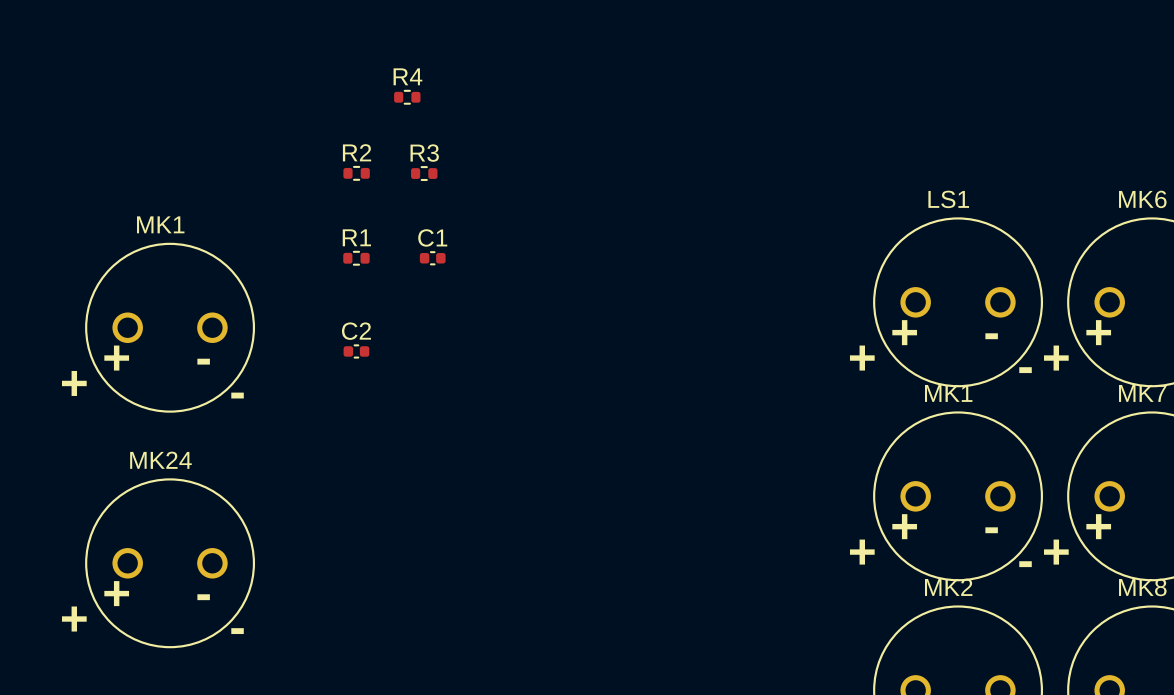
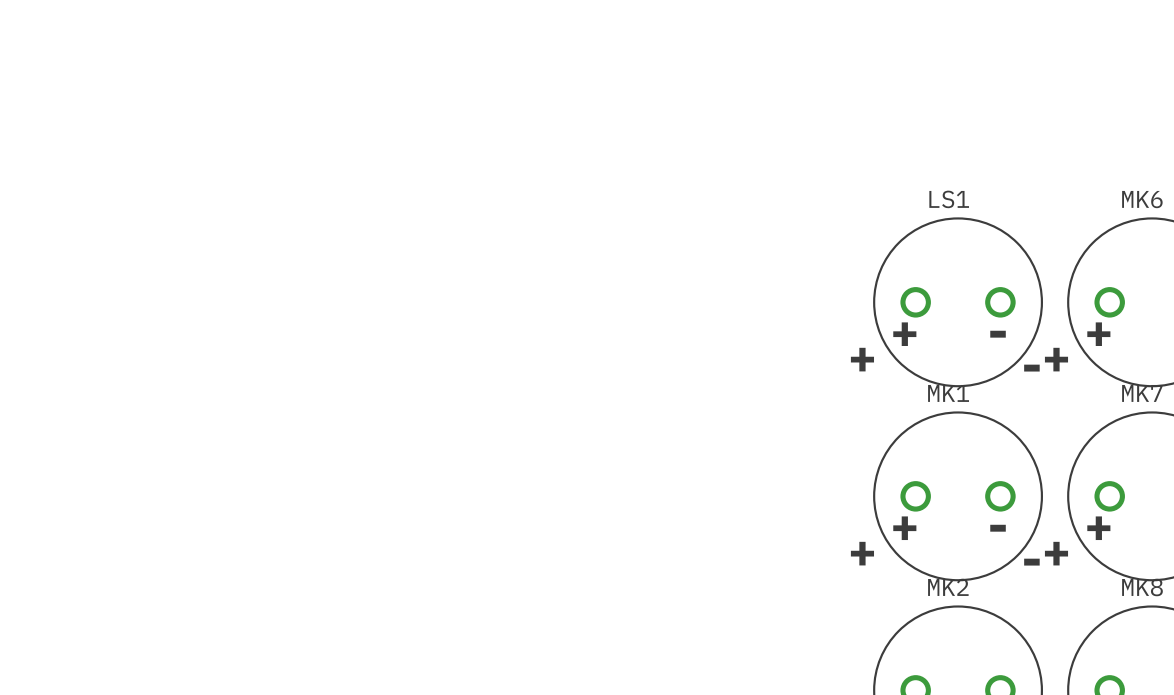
R4: (407, 97) -> none
R2: (356, 173) -> none
R3: (424, 173) -> none
R1: (356, 258) -> none
C1: (432, 258) -> none
MK1: (170, 327) -> none
C2: (356, 351) -> none
MK24: (170, 563) -> none

